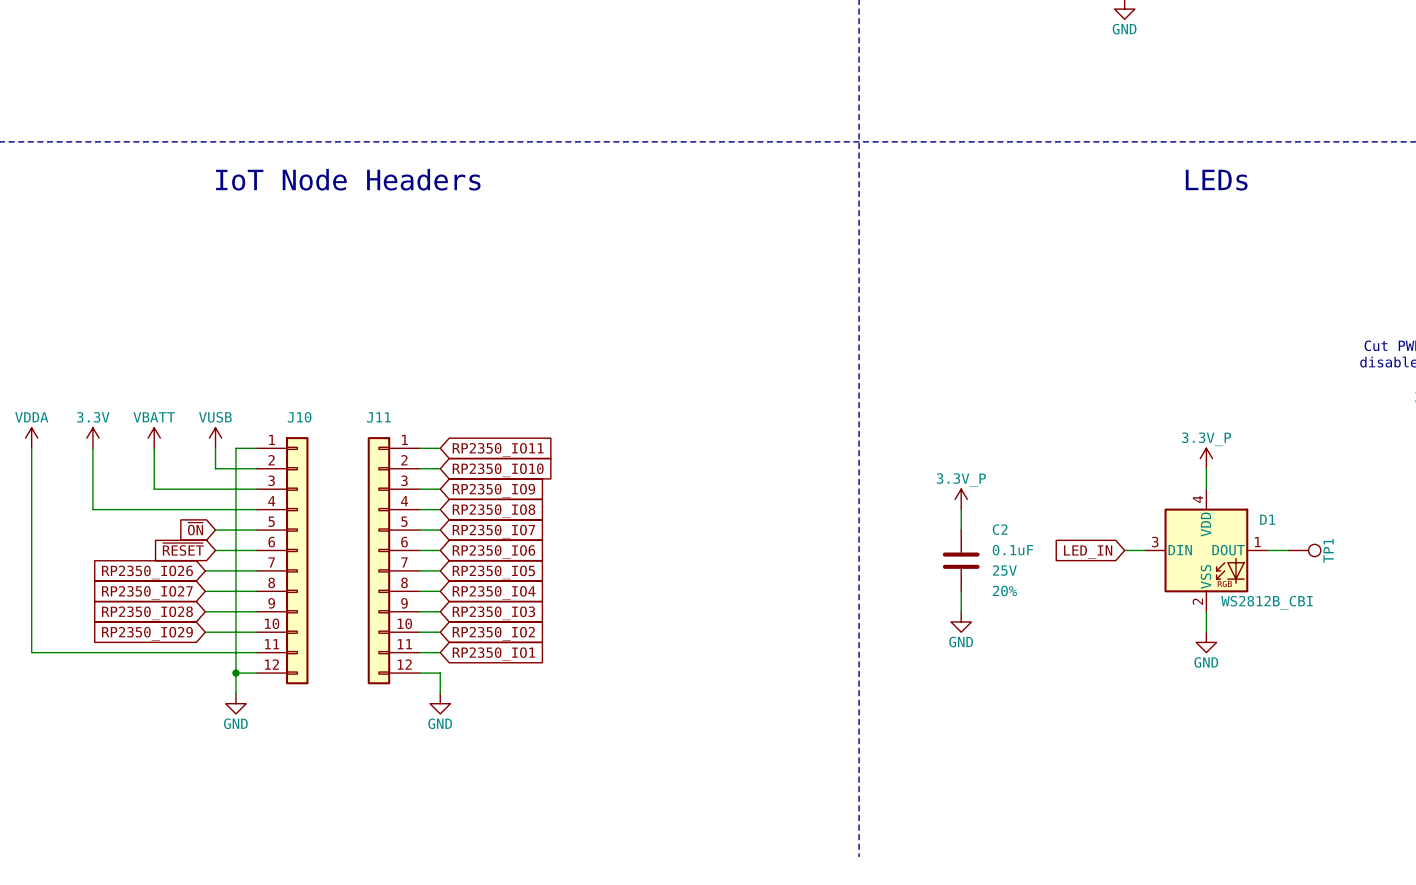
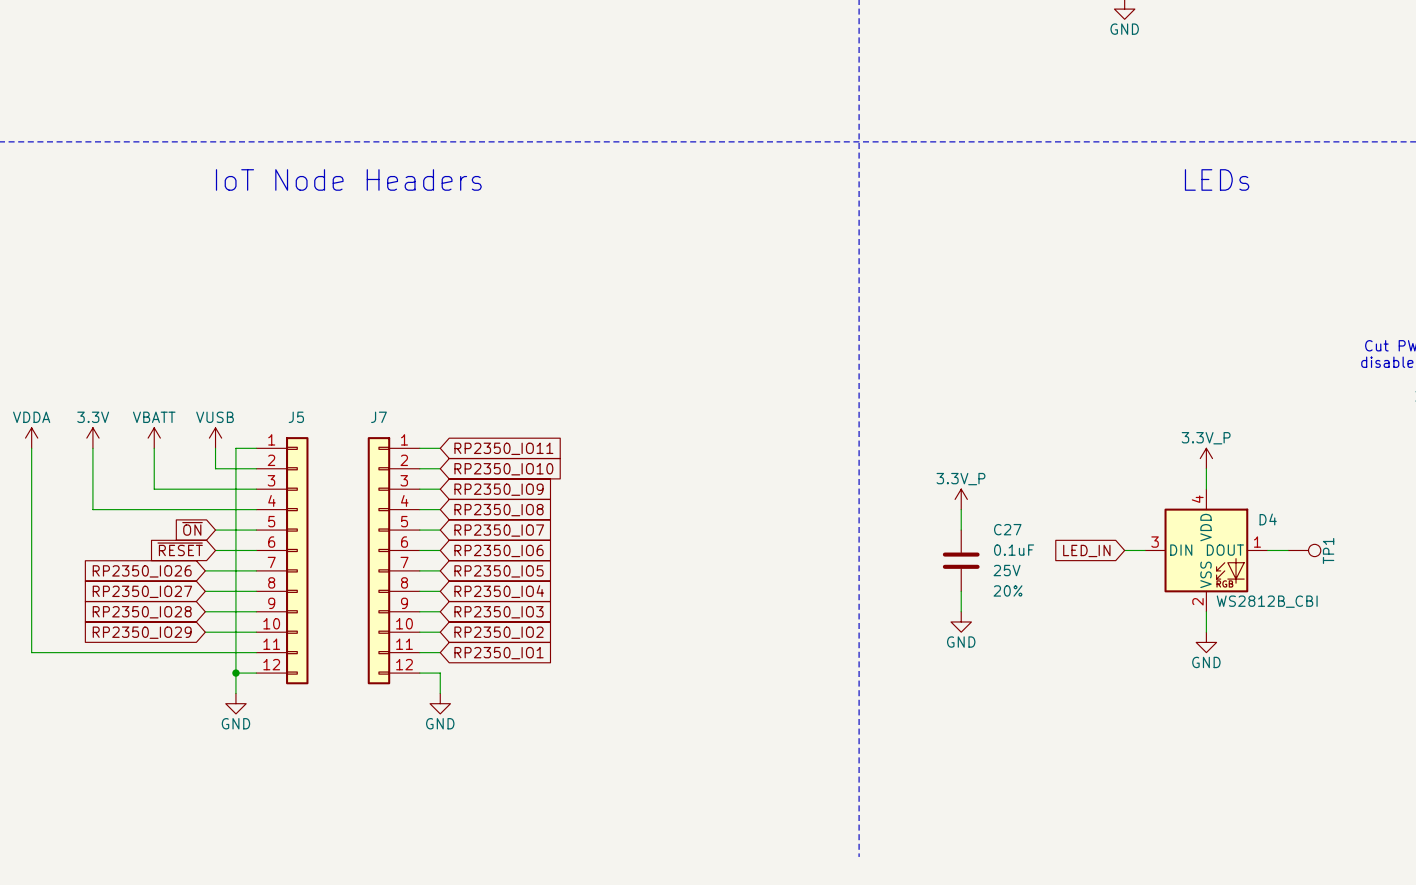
J10 name: J10 (299, 417) -> J5 (296, 417)
J11 name: J11 (378, 417) -> J7 (378, 417)
D1 name: D1 (1267, 519) -> D4 (1268, 519)
C2 name: C2 (1000, 529) -> C27 (1007, 529)

